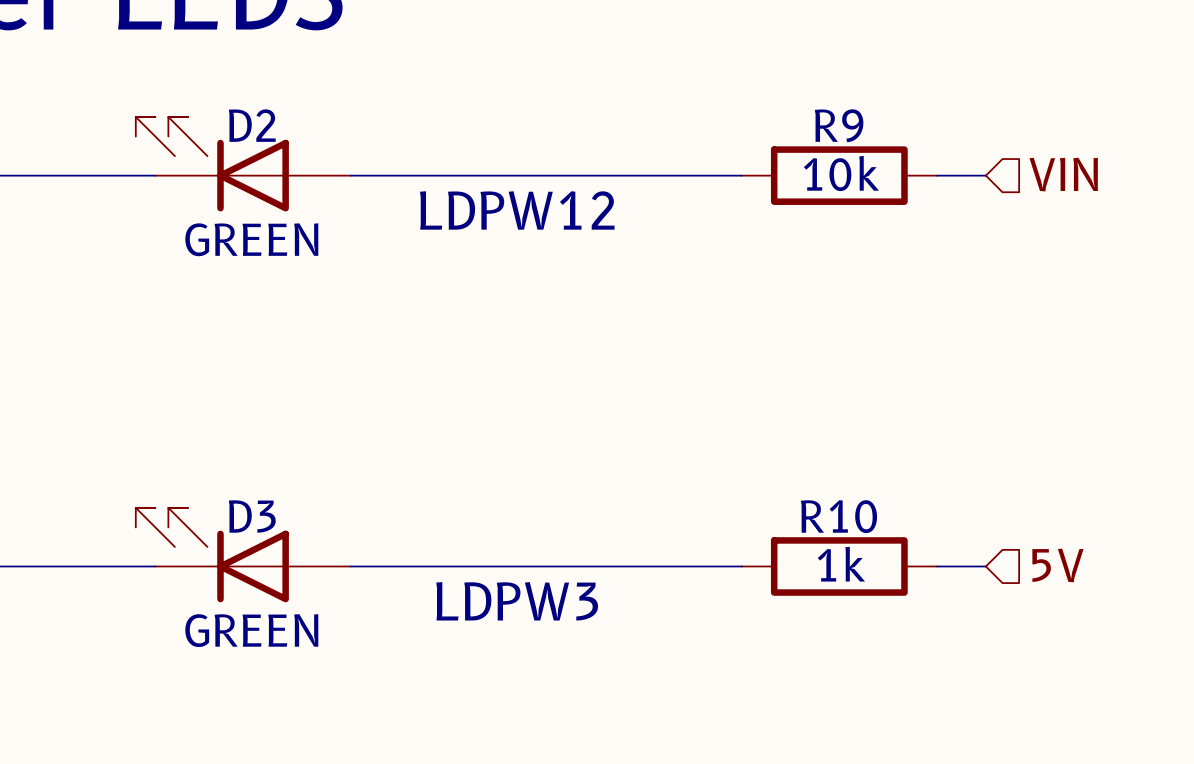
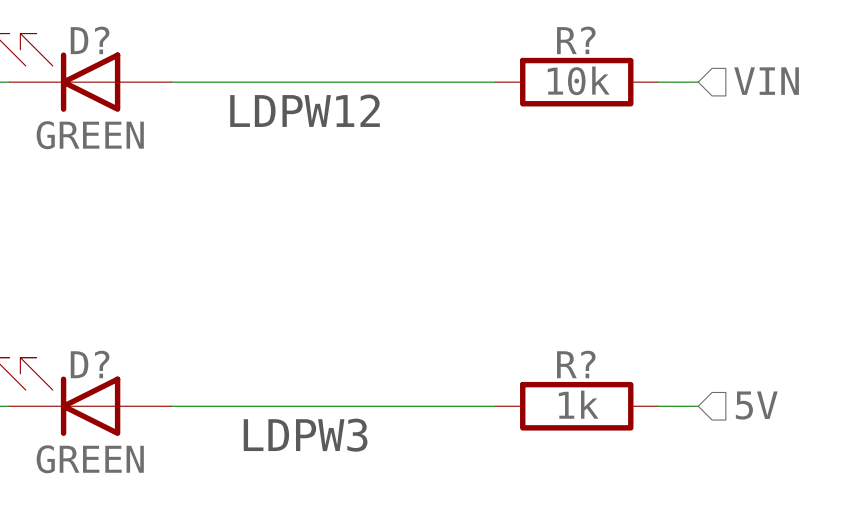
D2 name: D2 (252, 125) -> D? (90, 40)
R9 name: R9 (839, 125) -> R? (576, 40)
D3 name: D3 (252, 516) -> D? (90, 364)
R10 name: R10 (838, 516) -> R? (576, 364)

